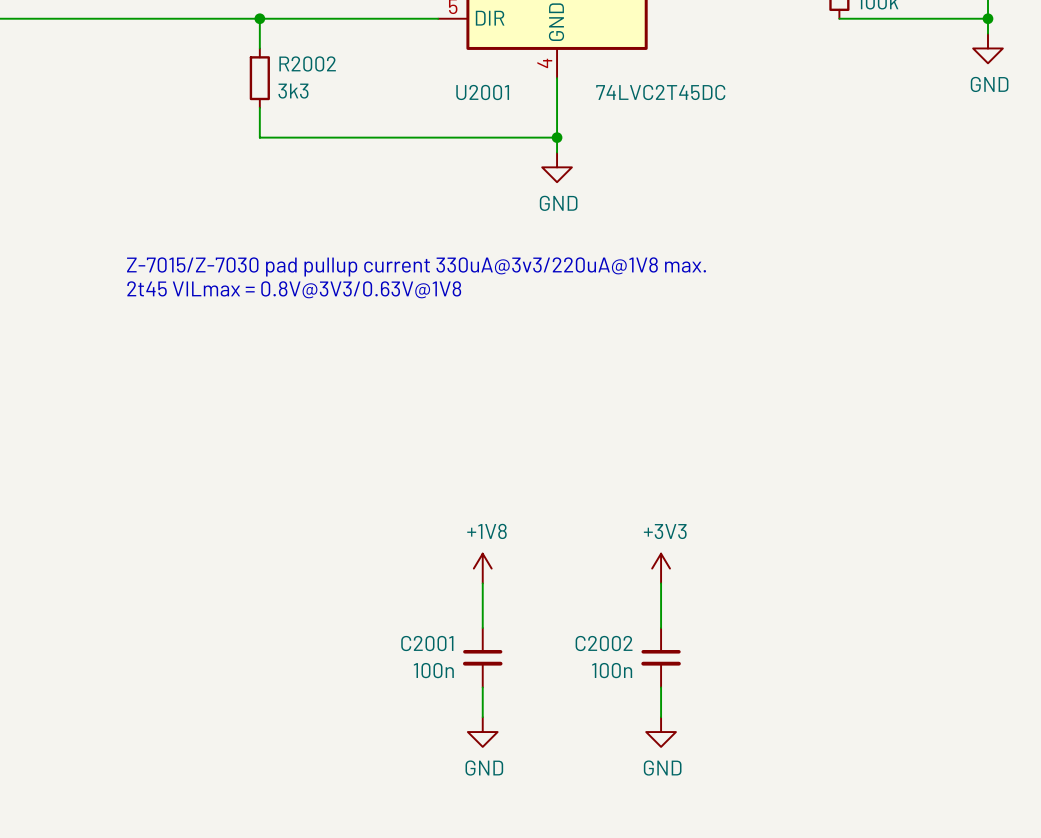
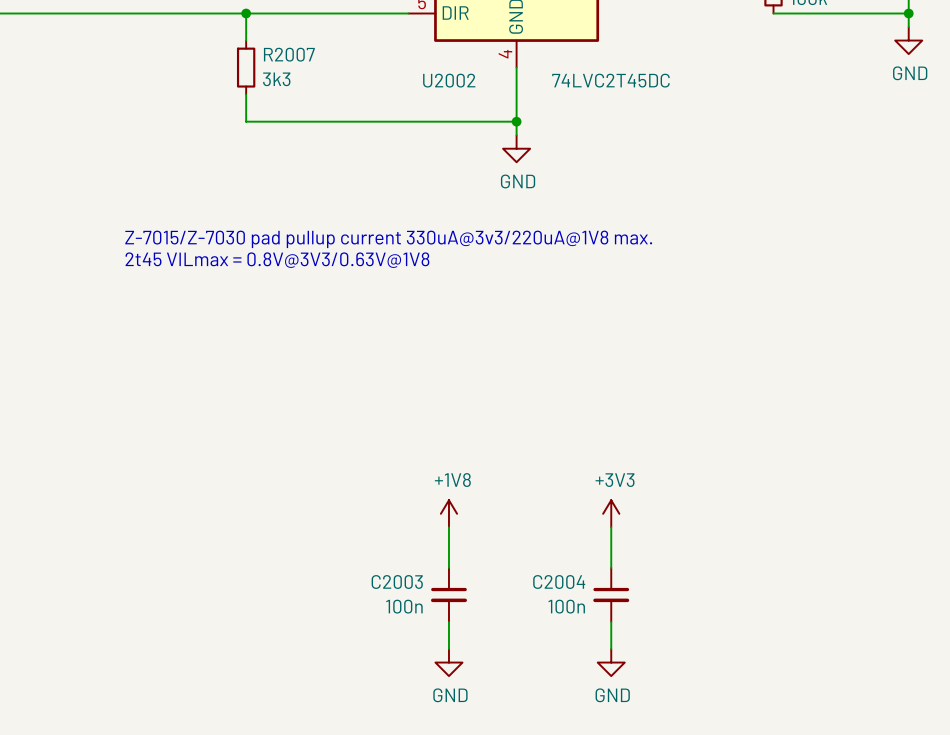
R2002 name: R2002 (307, 63) -> R2007 (289, 54)
U2001 name: U2001 (482, 92) -> U2002 (449, 80)
C2001 name: C2001 (427, 643) -> C2003 (397, 582)
C2002 name: C2002 (604, 643) -> C2004 (559, 582)

